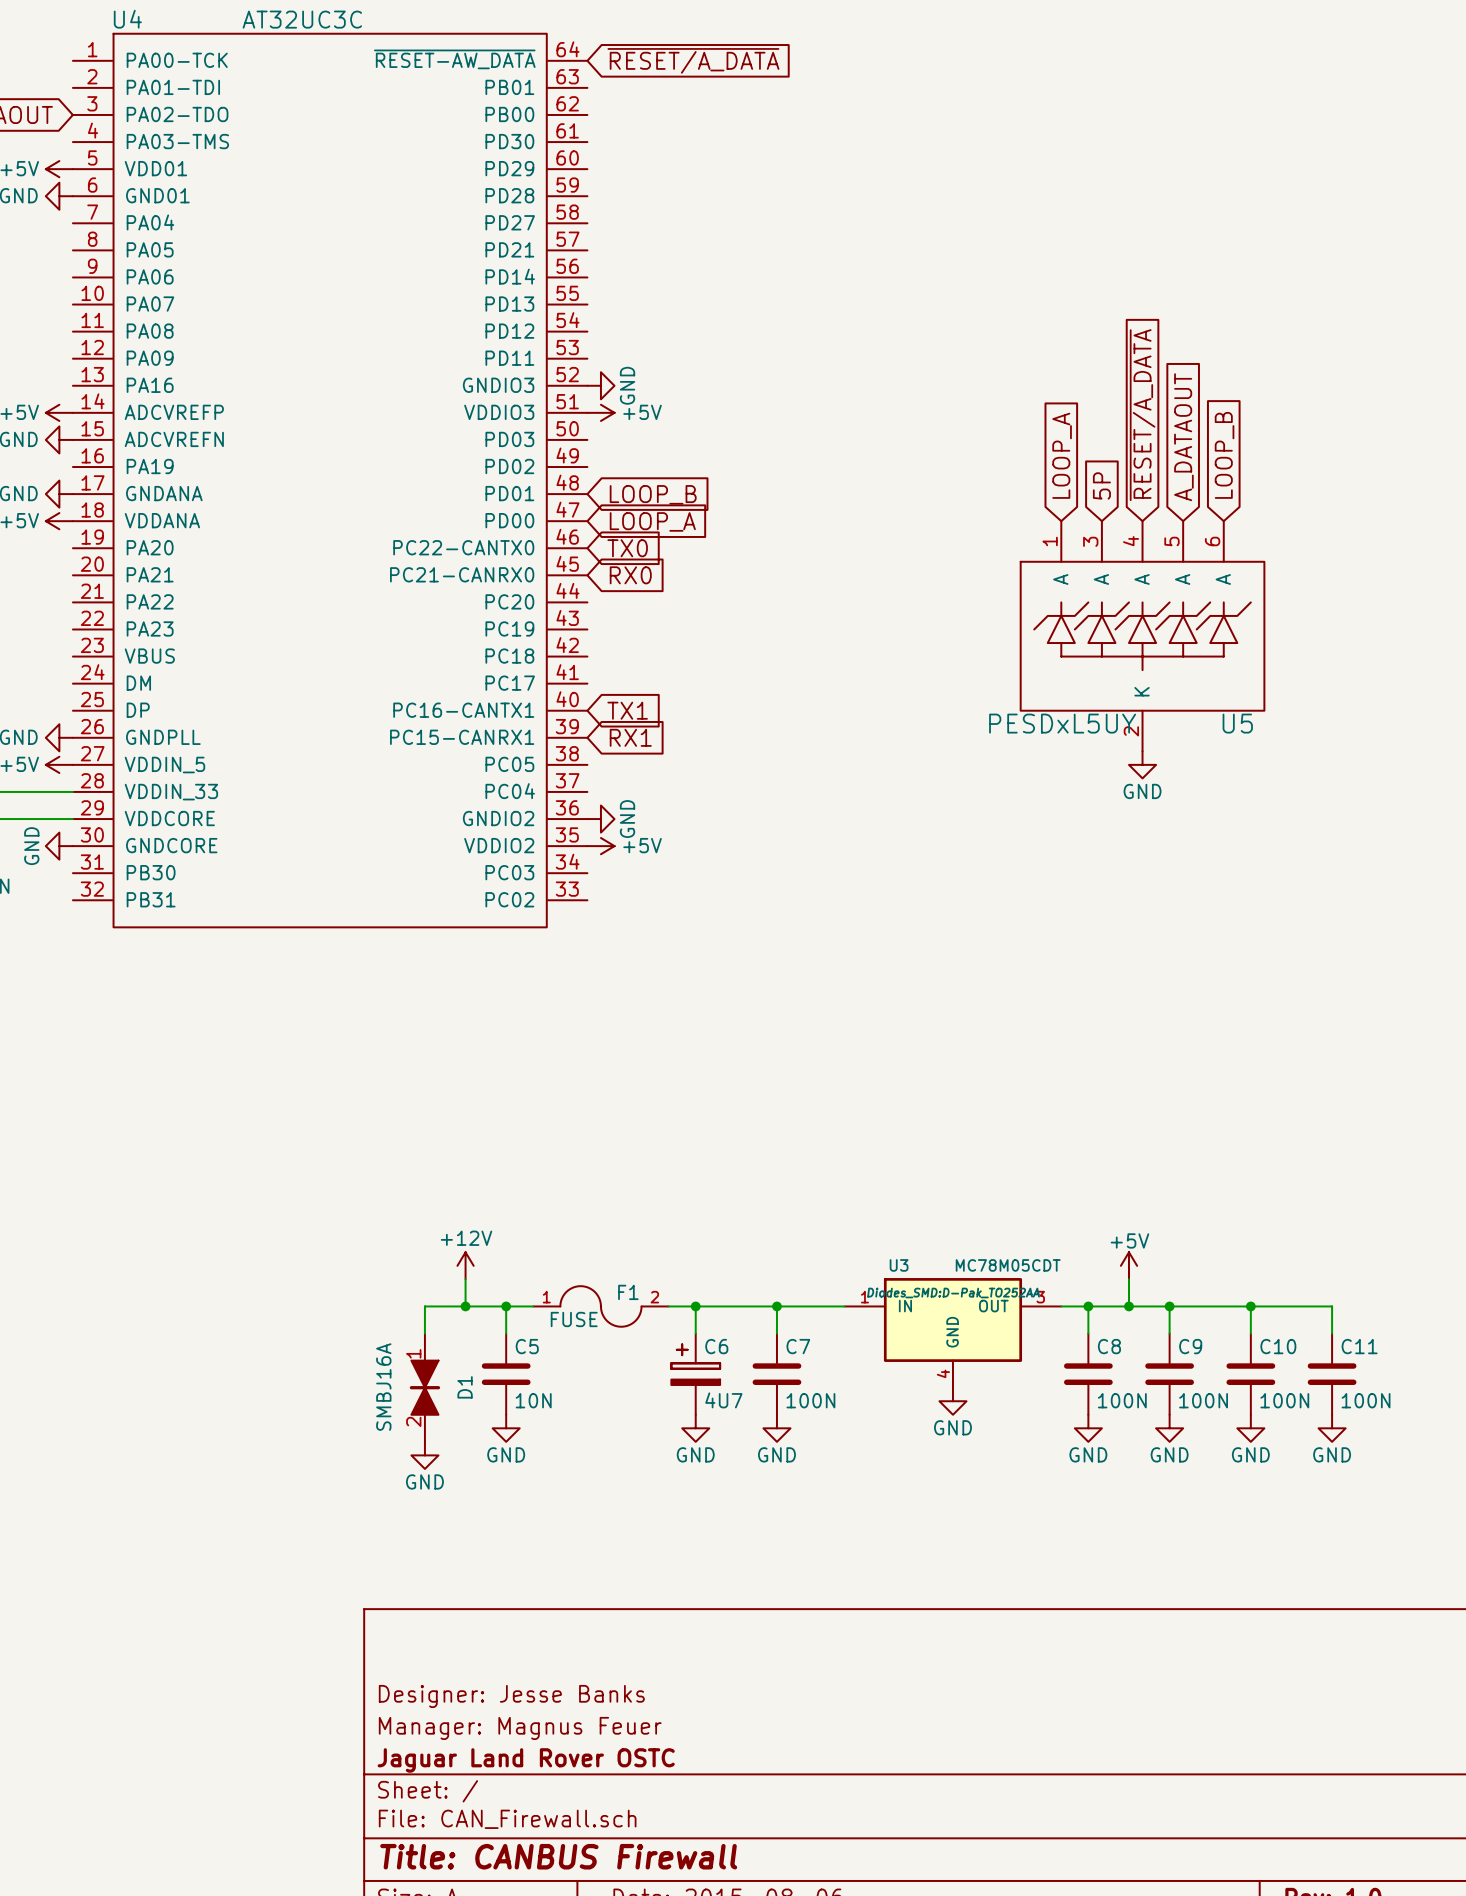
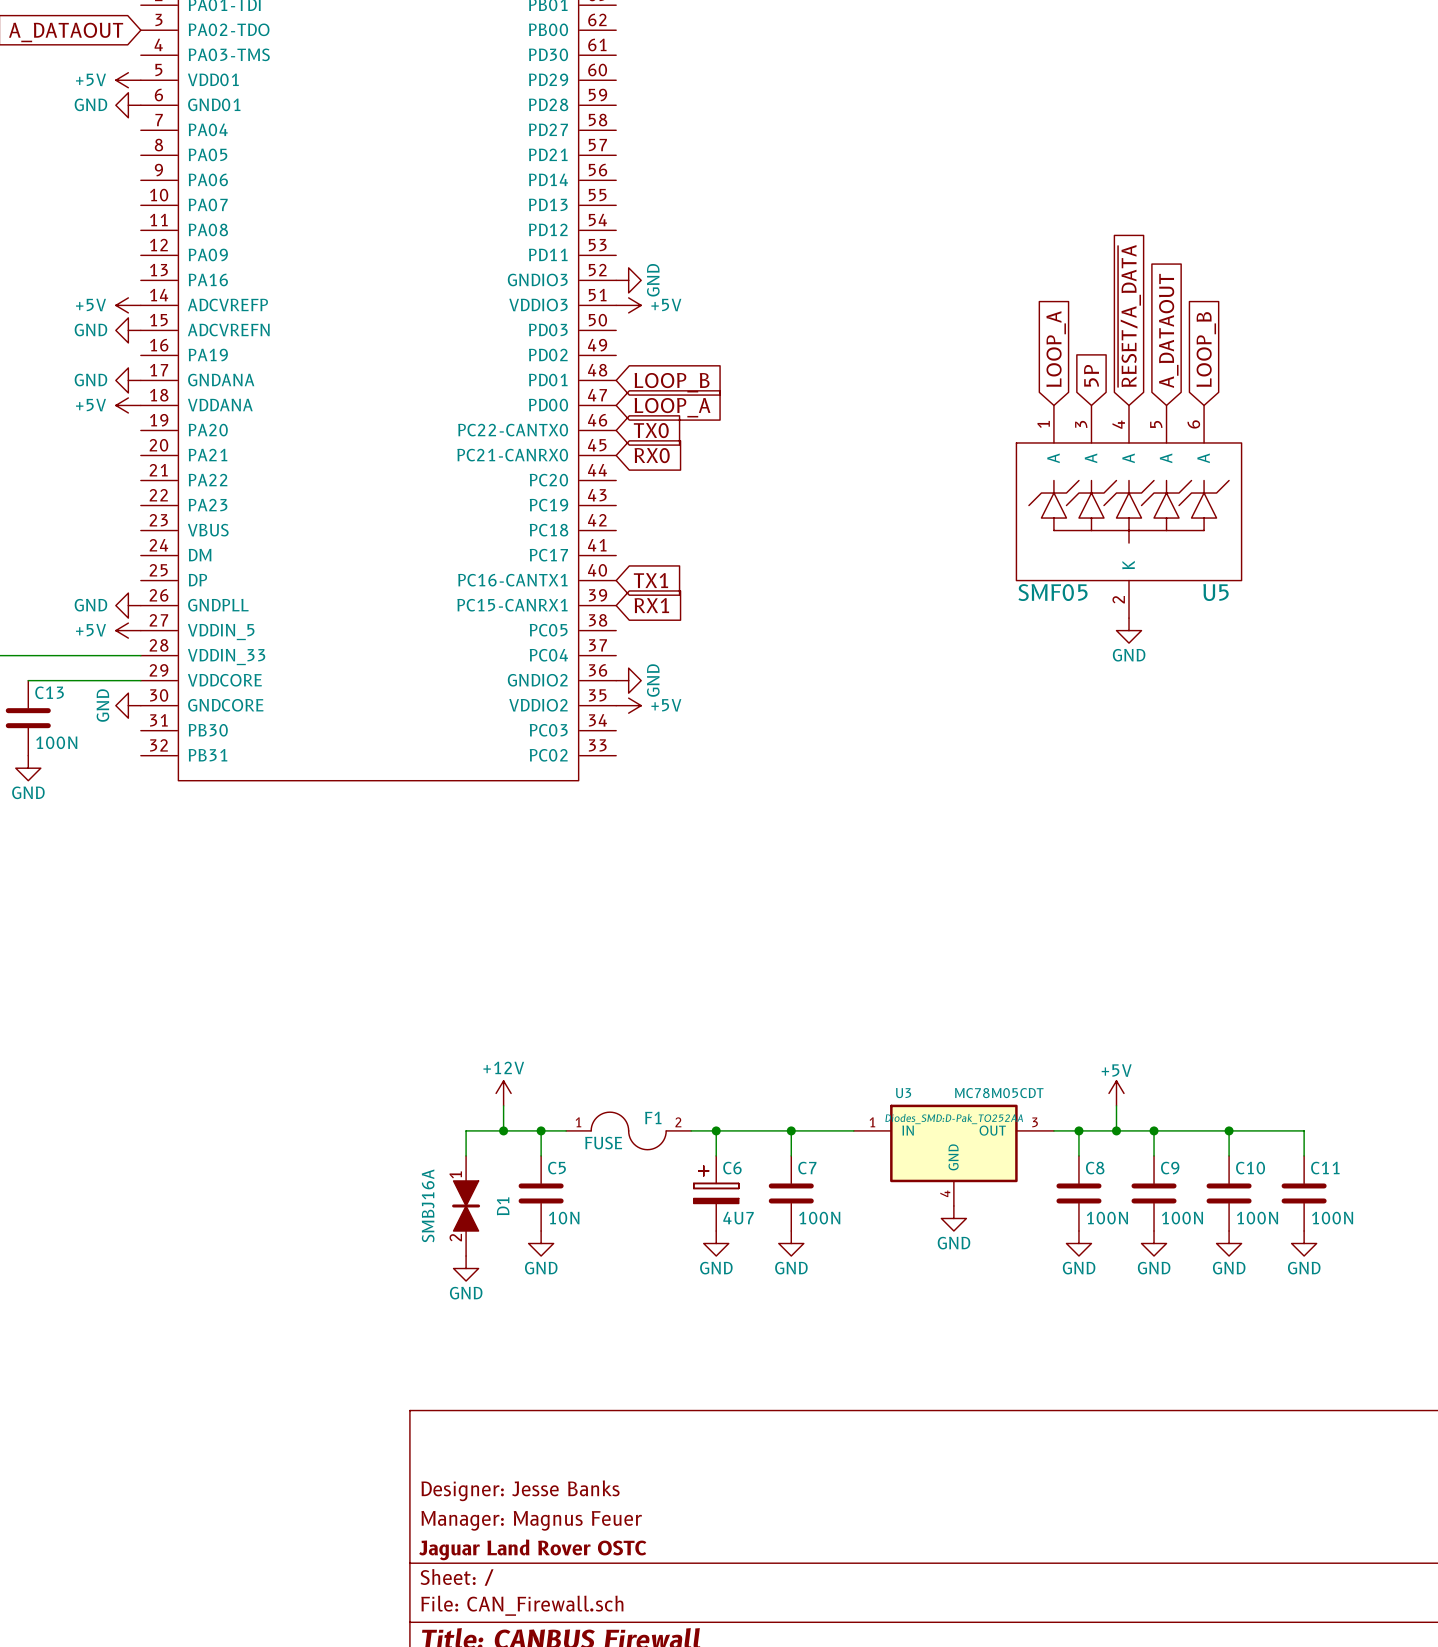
U5 value: PESDxL5UY (1062, 723) -> SMF05 (1053, 592)

